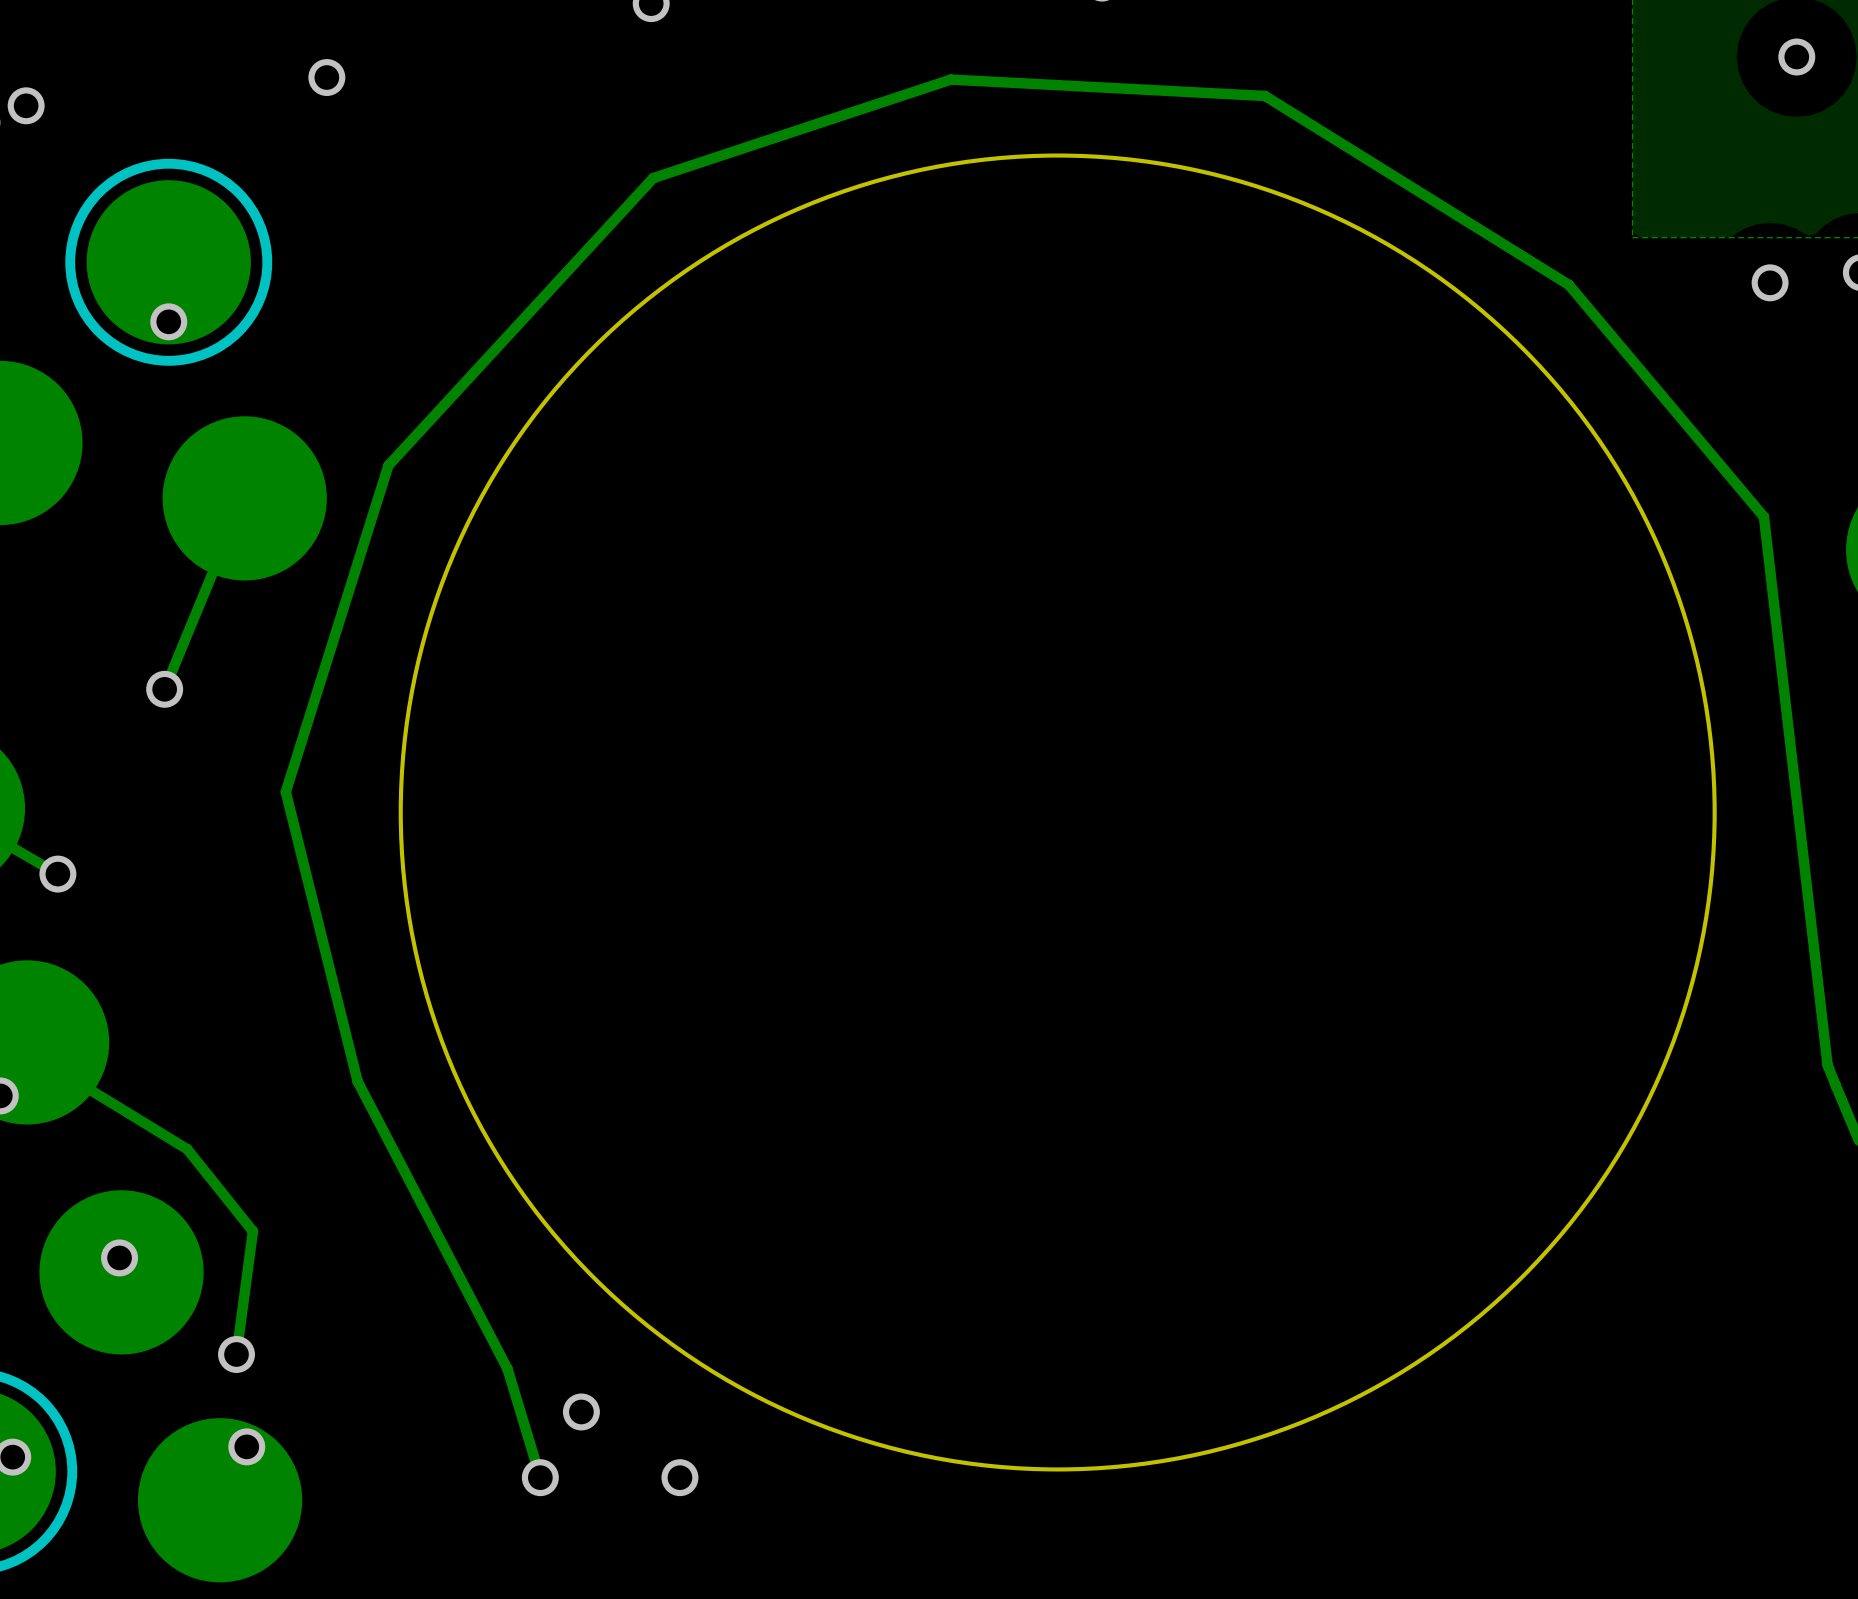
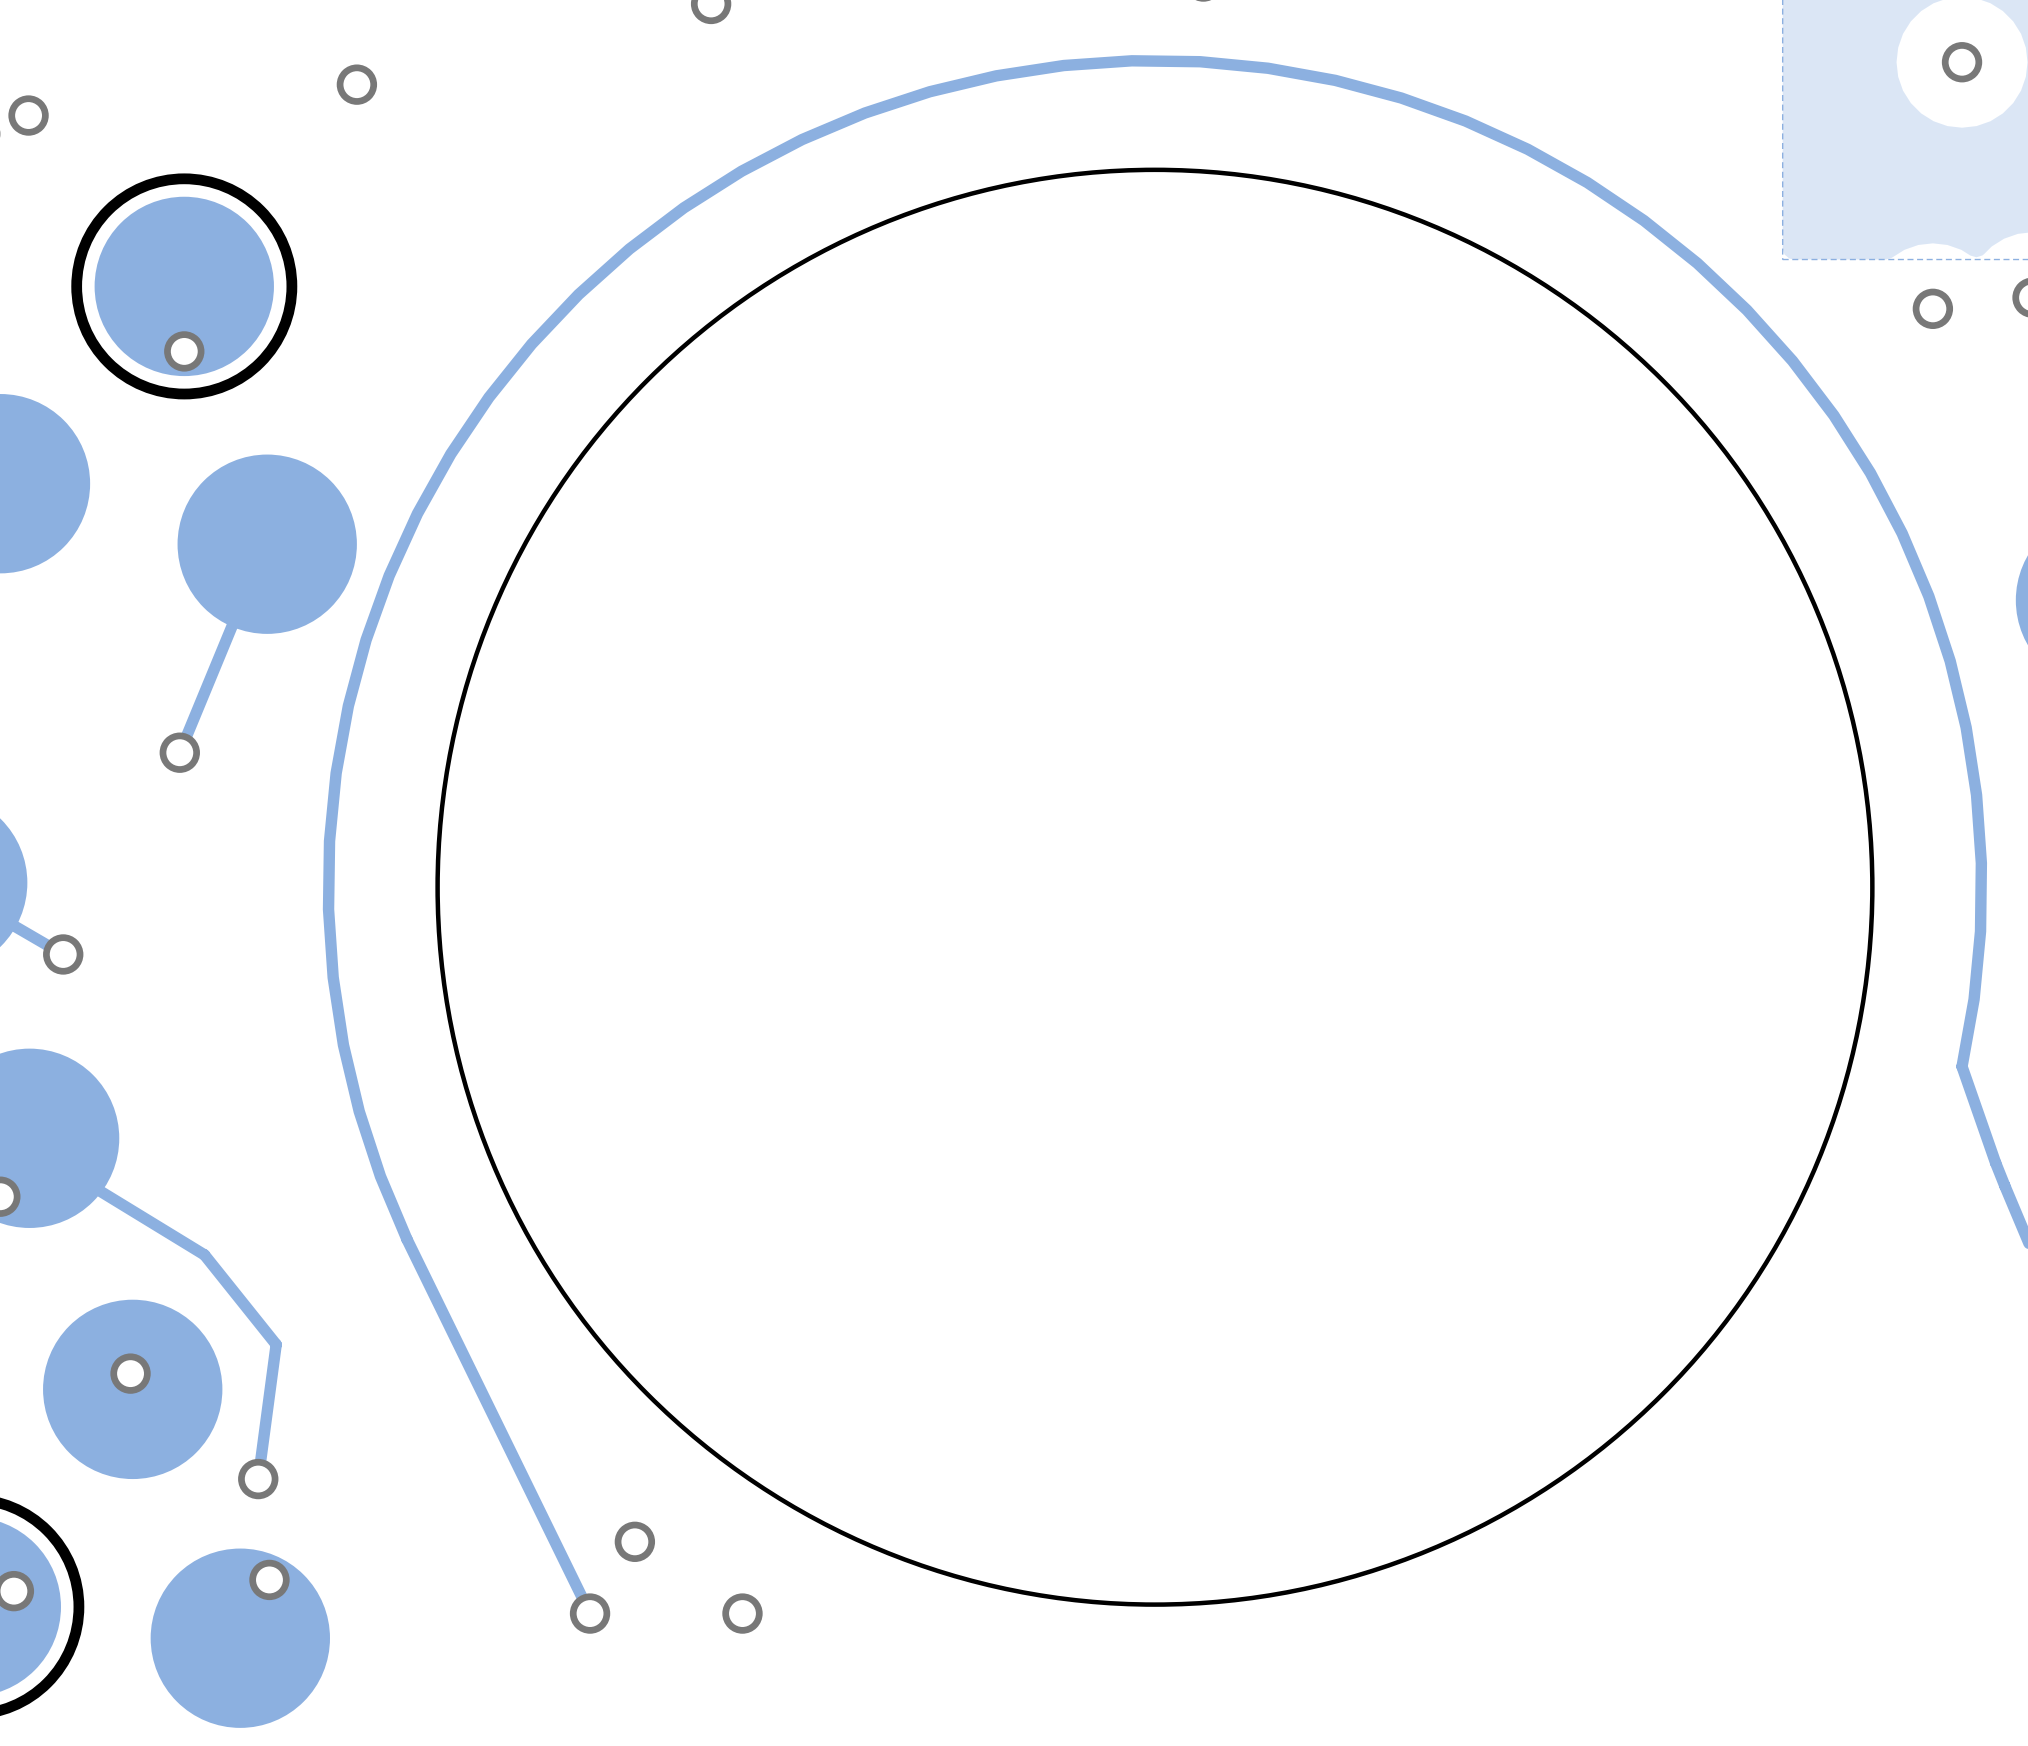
track: (1827, 1065) (1763, 516) (1568, 284) (1265, 96) (950, 79) (653, 178) (388, 465) (285, 791) (357, 1081) (507, 1368) (540, 1477) -> (1995, 1162) (1962, 1066) (1974, 999) (1980, 931) (1981, 863) (1976, 795) (1966, 727) (1950, 661) (1928, 596) (1902, 533) (1870, 472) (1833, 415) (1792, 360) (1746, 310) (1697, 263) (1643, 220) (1587, 182) (1527, 149) (1465, 121) (1401, 98) (1335, 80) (1268, 68) (1200, 61) (1131, 60) (1063, 65) (996, 75) (929, 91) (864, 113) (802, 139) (741, 171) (683, 207) (629, 249) (578, 294) (531, 344) (488, 397) (450, 454) (417, 513) (389, 575) (366, 640) (348, 705) (336, 773) (329, 841) (328, 909) (333, 977) (343, 1044) (359, 1111) (380, 1176) (406, 1239) (590, 1613)

